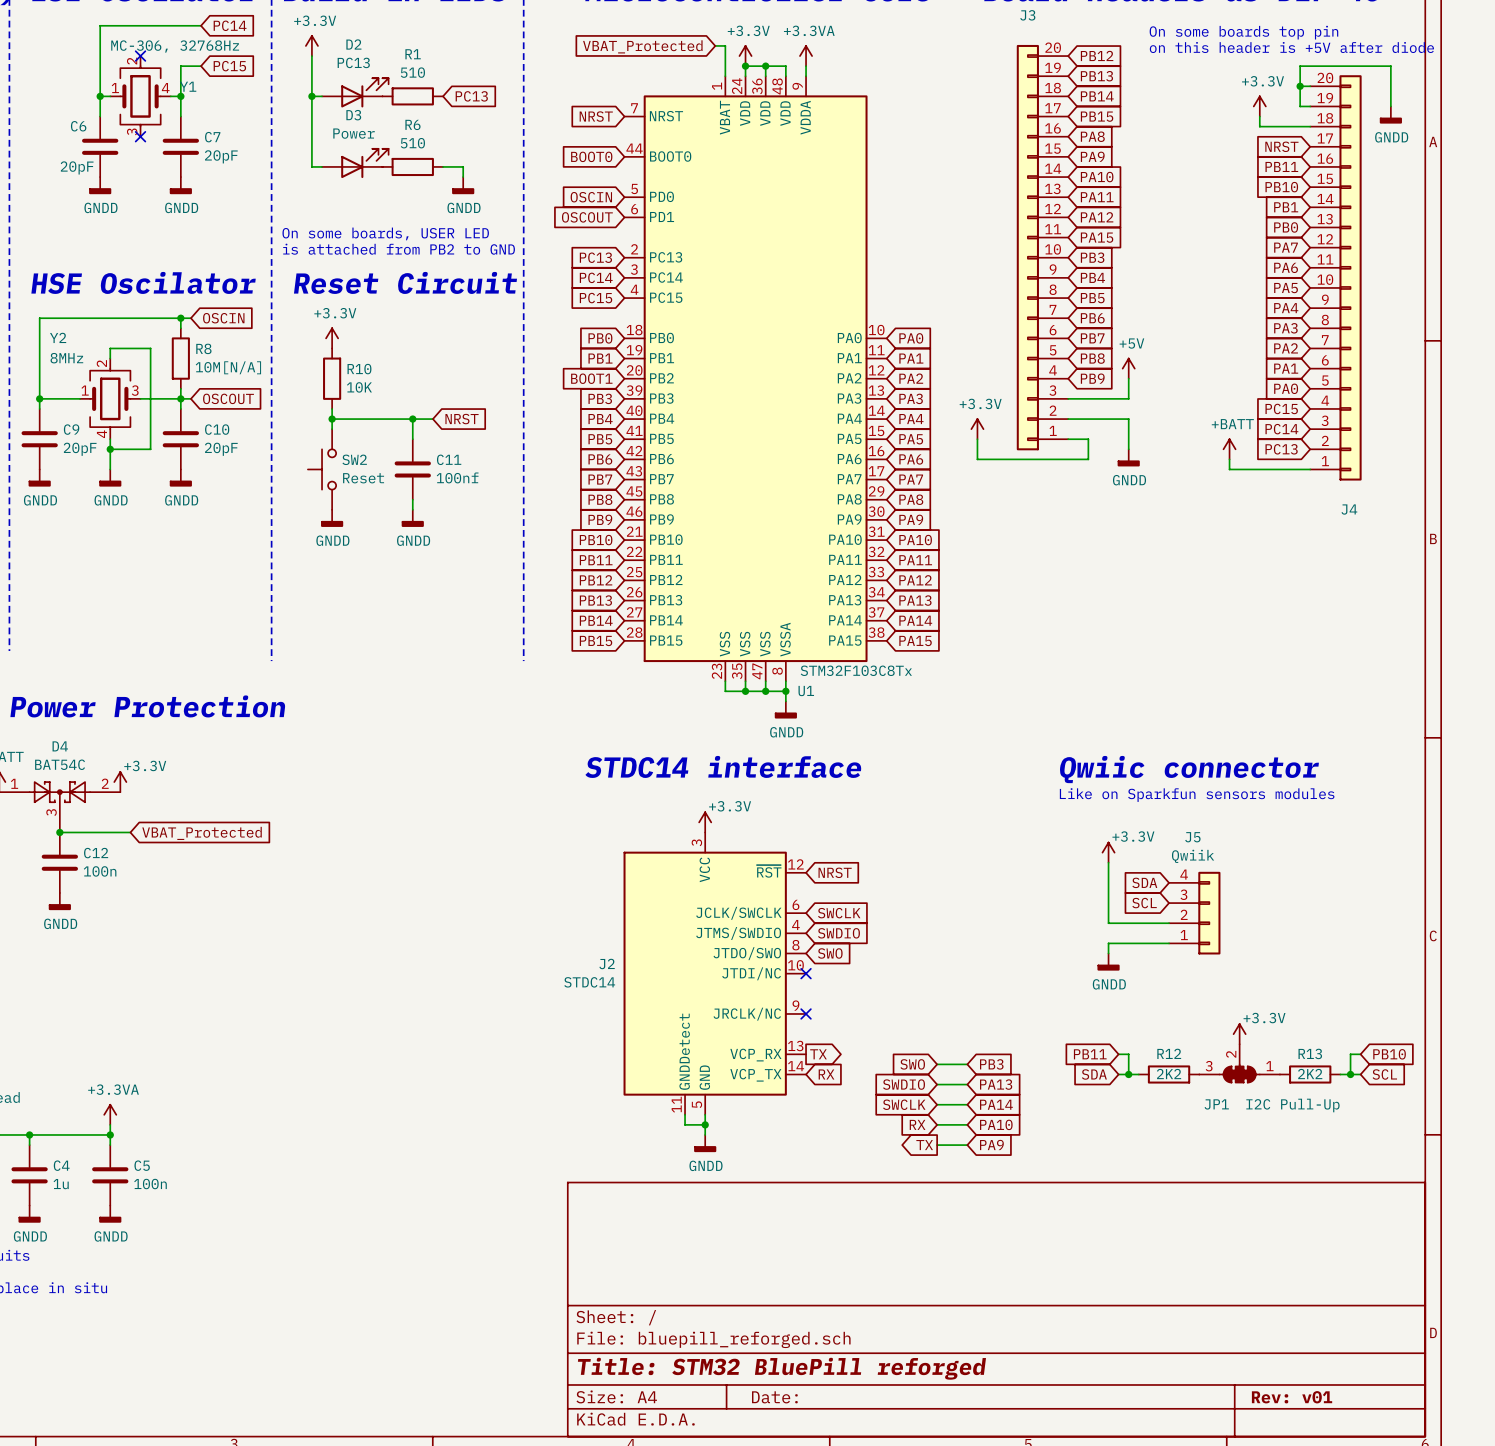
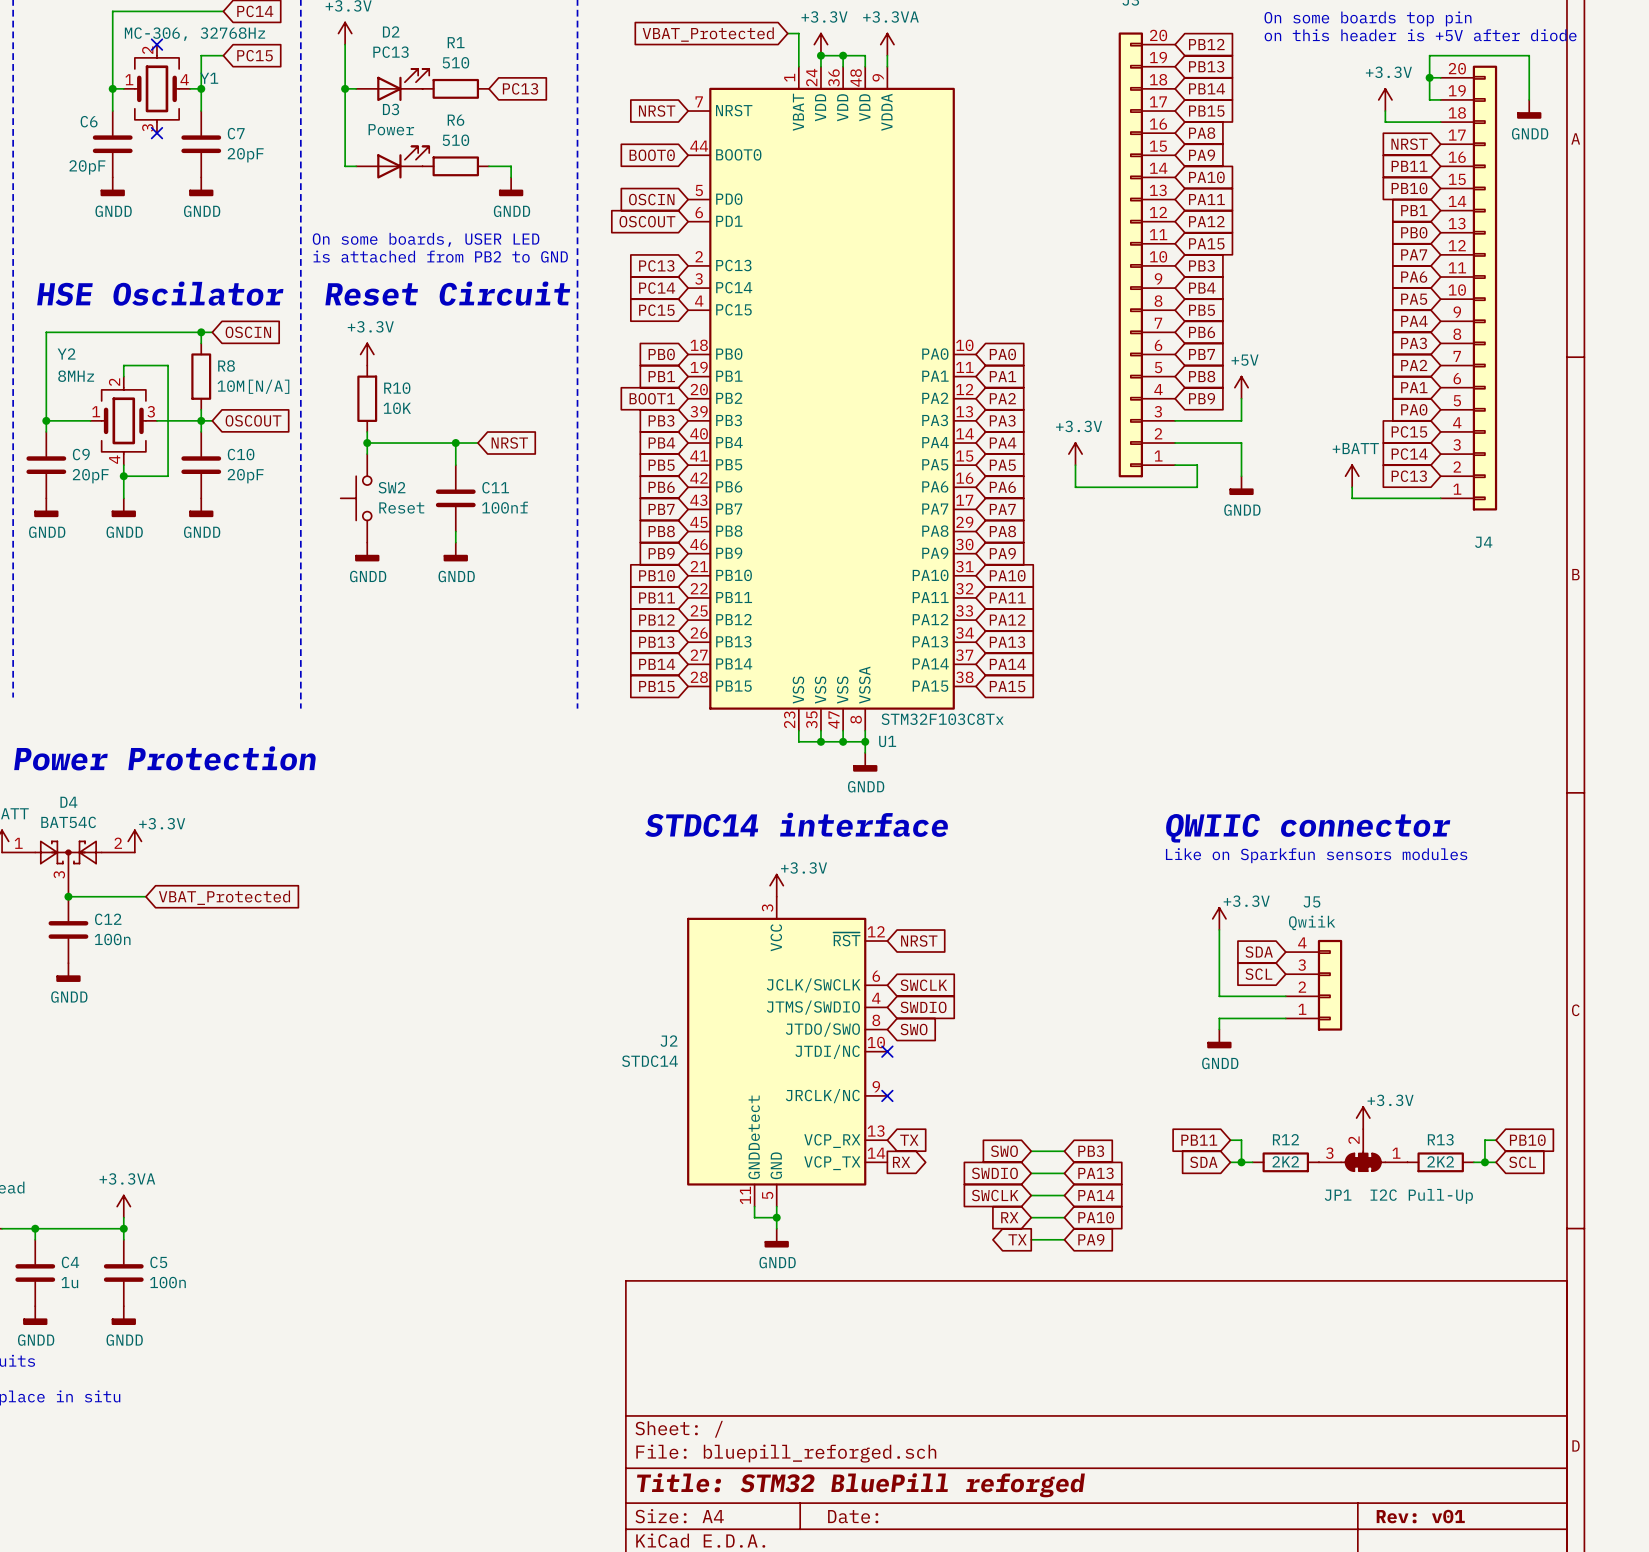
text: Qwiic connector (1189, 769) -> QWIIC connector (1307, 828)
global label shape: output (818, 1054) -> input (909, 1140)
global label shape: input (826, 1074) -> output (901, 1162)

